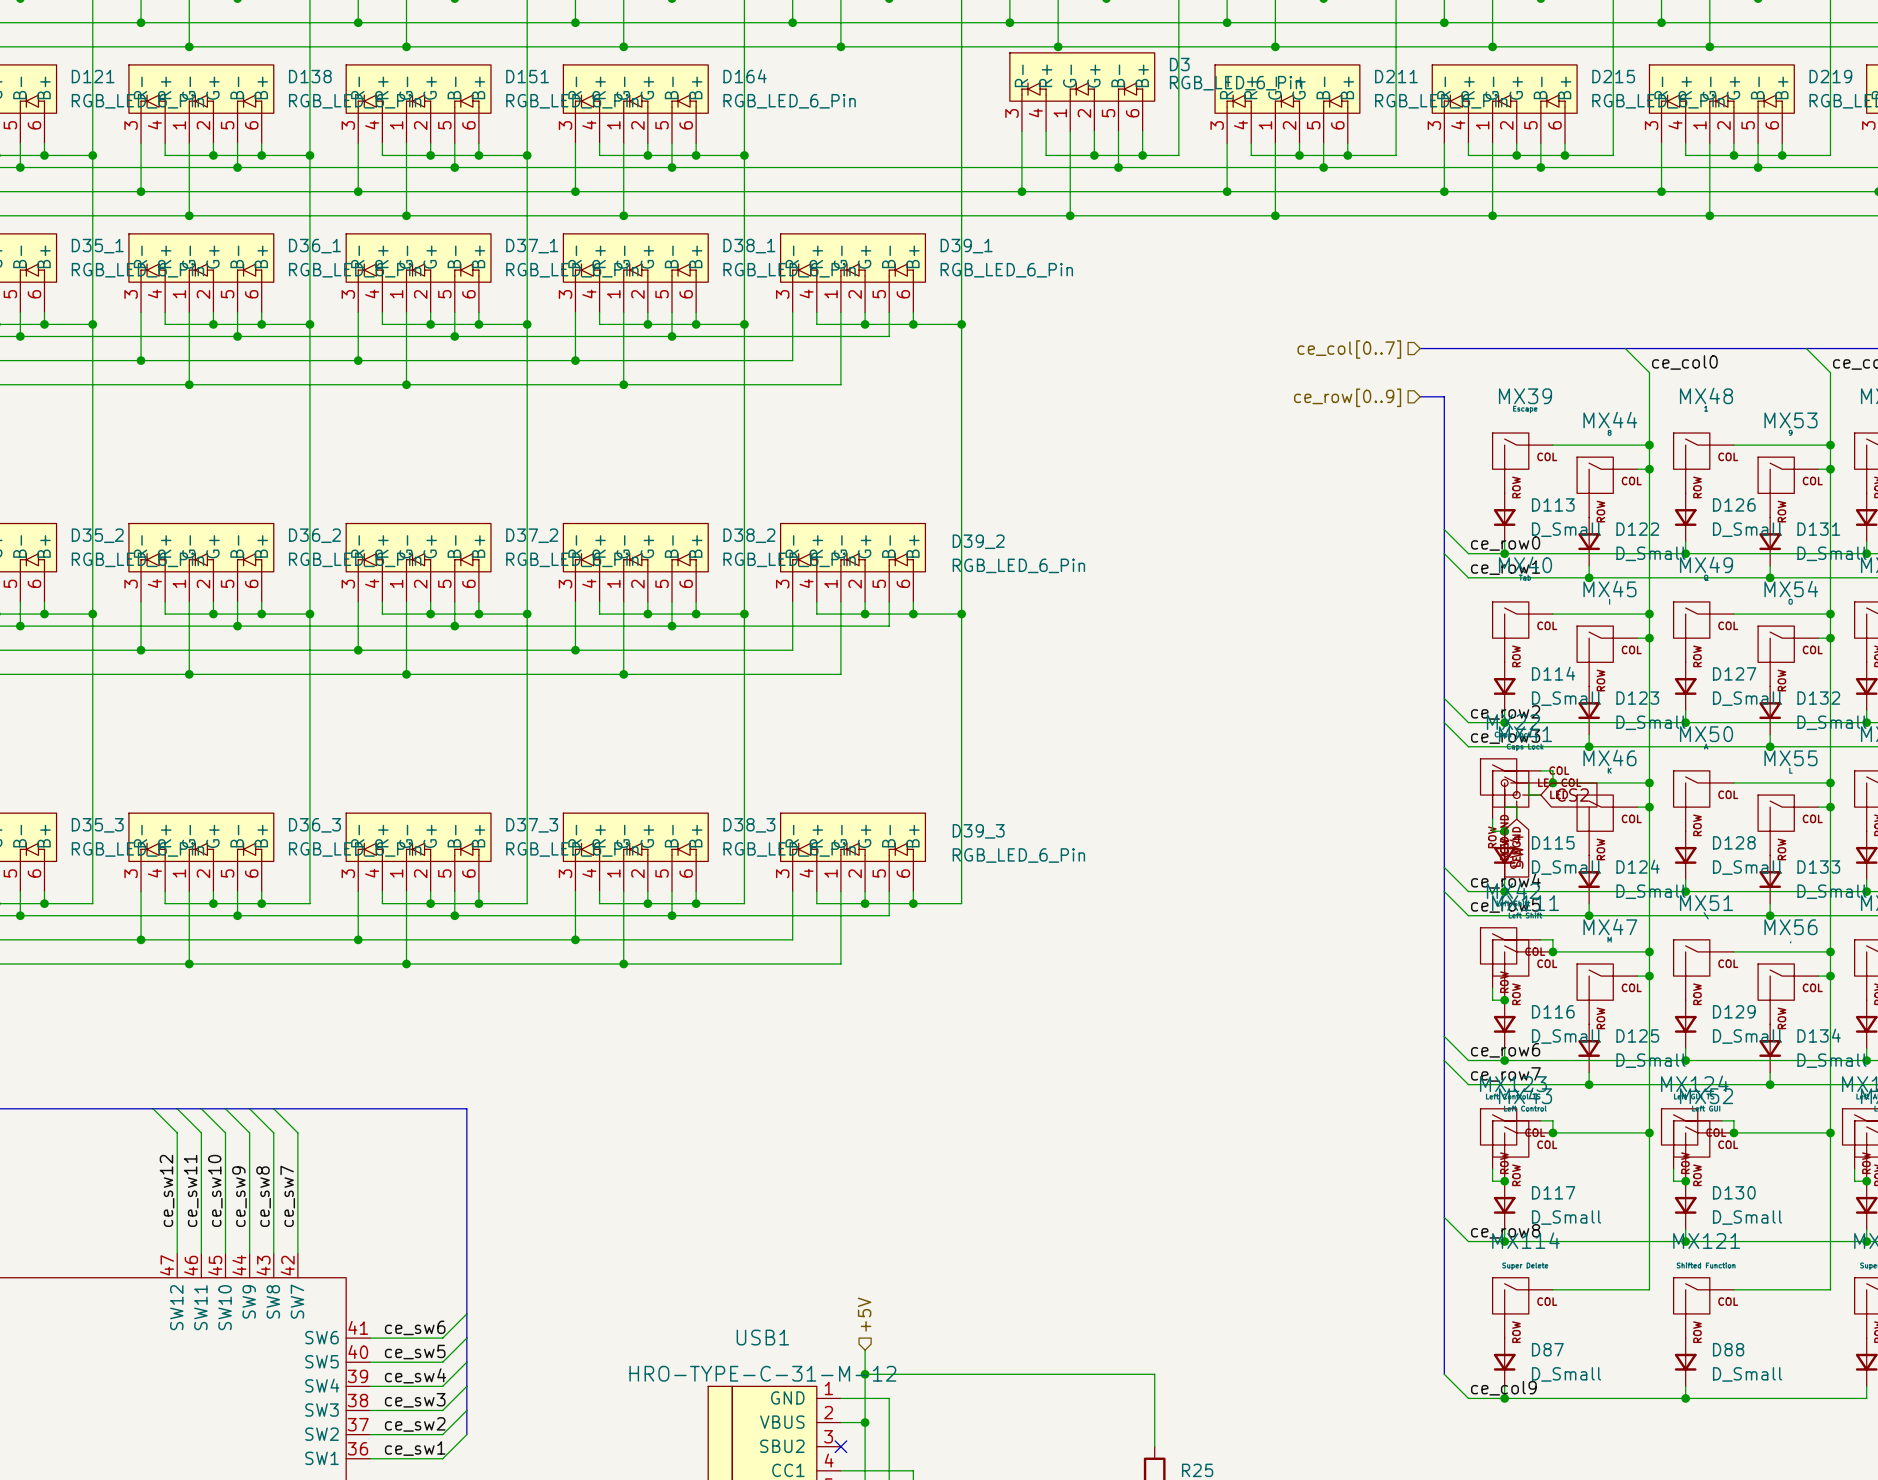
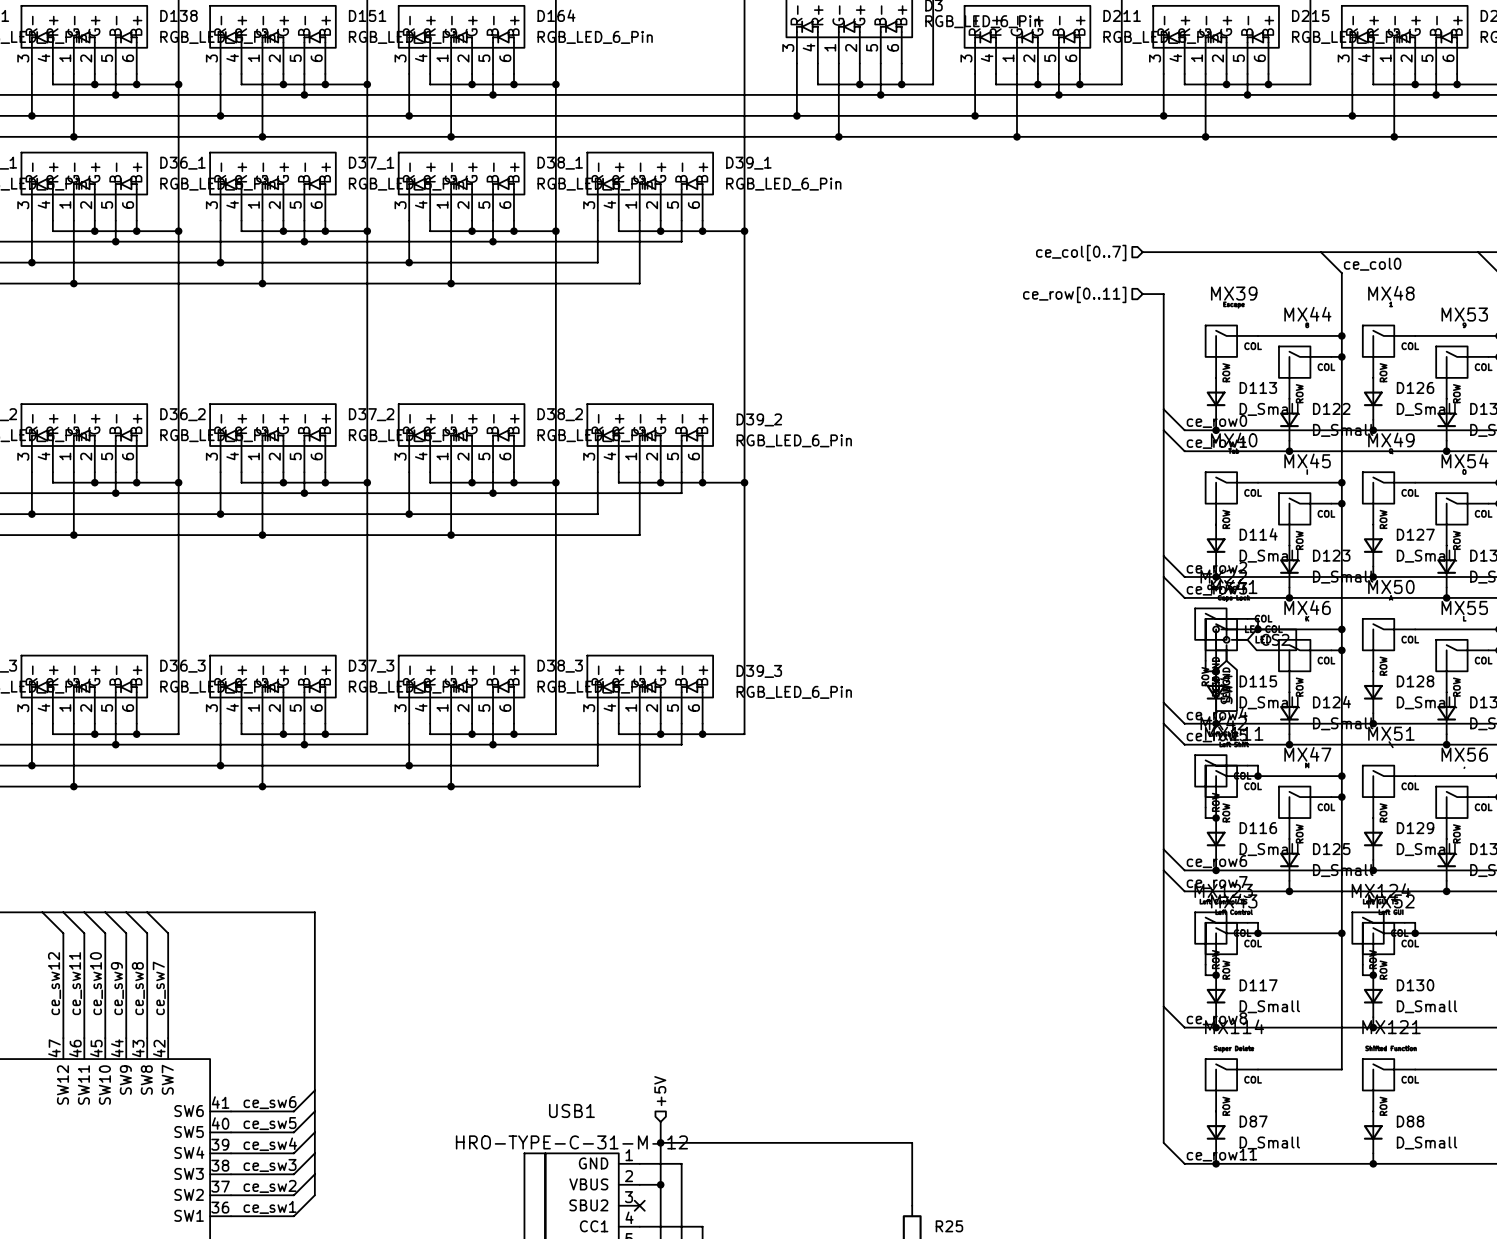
hierarchical label: ce_row[0..9] (1347, 397) -> ce_row[0..11] (1074, 294)
label: ce_col9 (1503, 1388) -> ce_row11 (1221, 1154)

